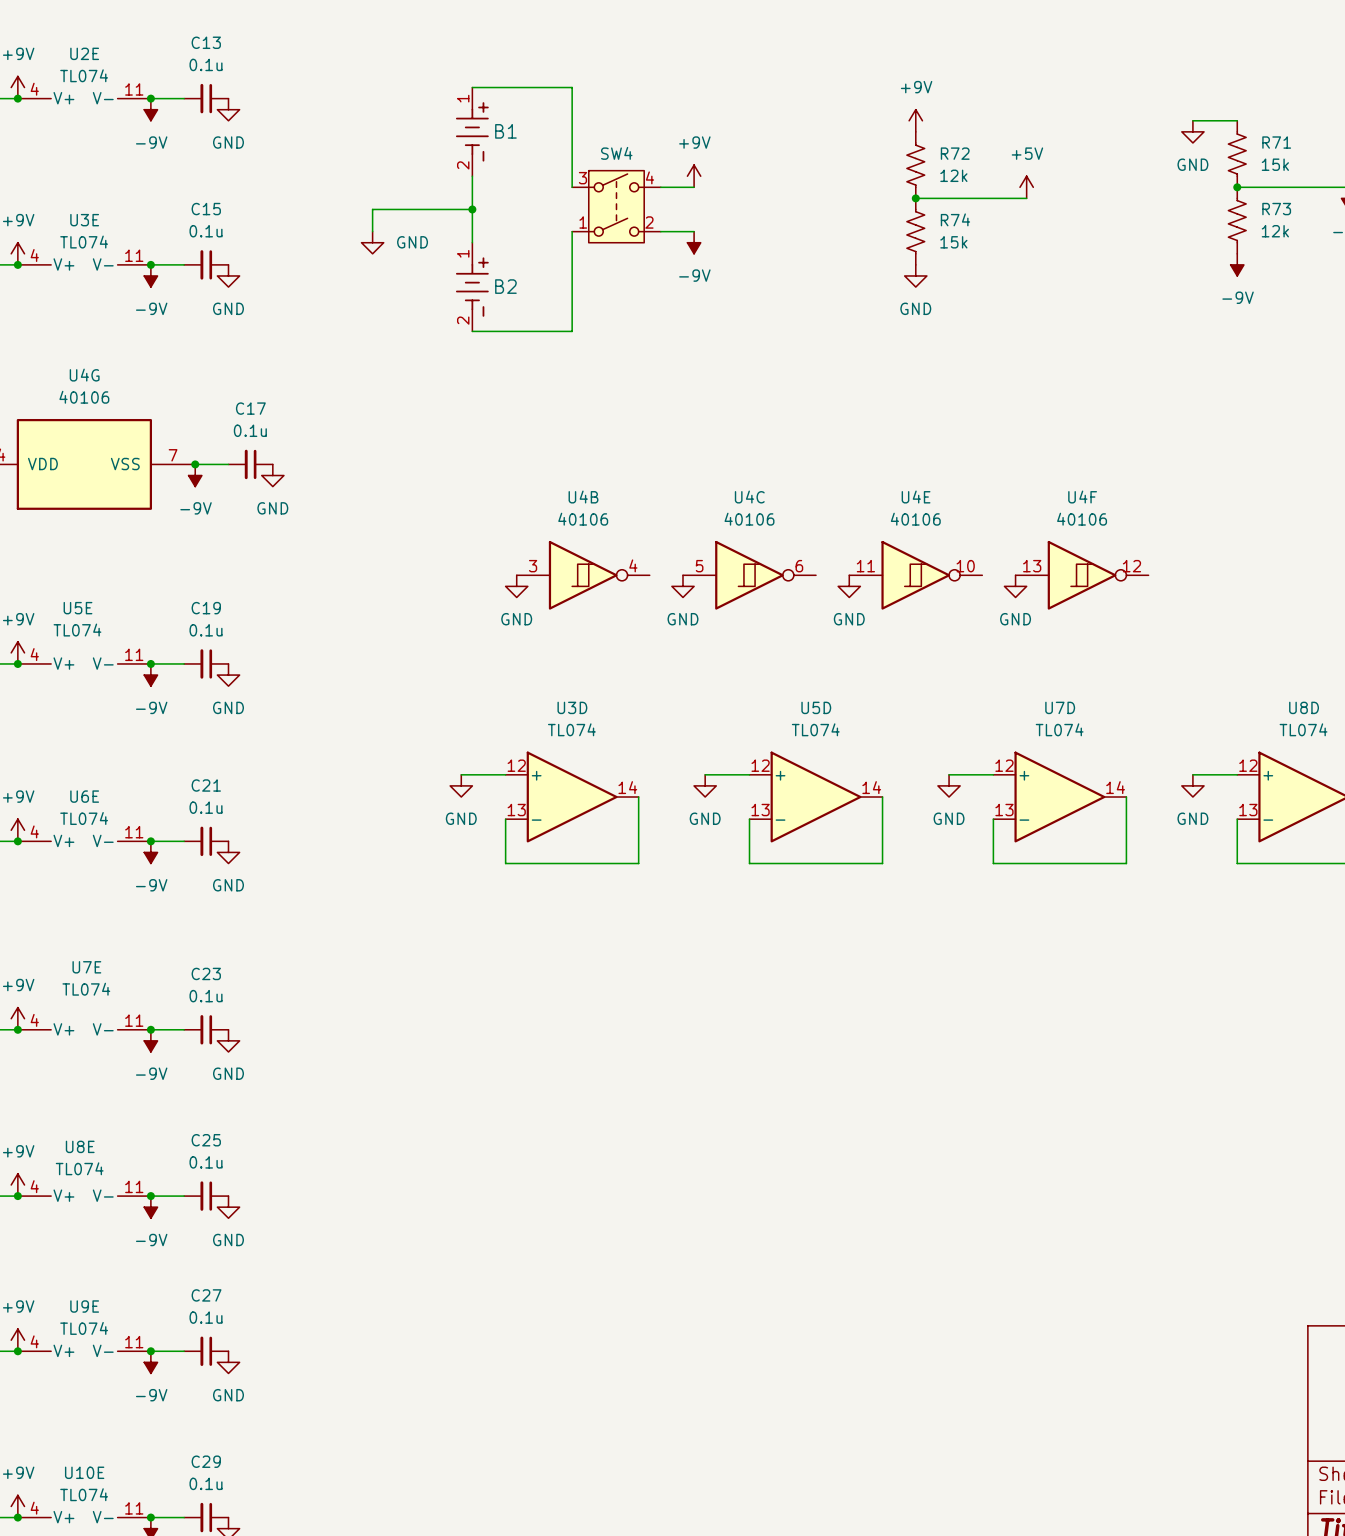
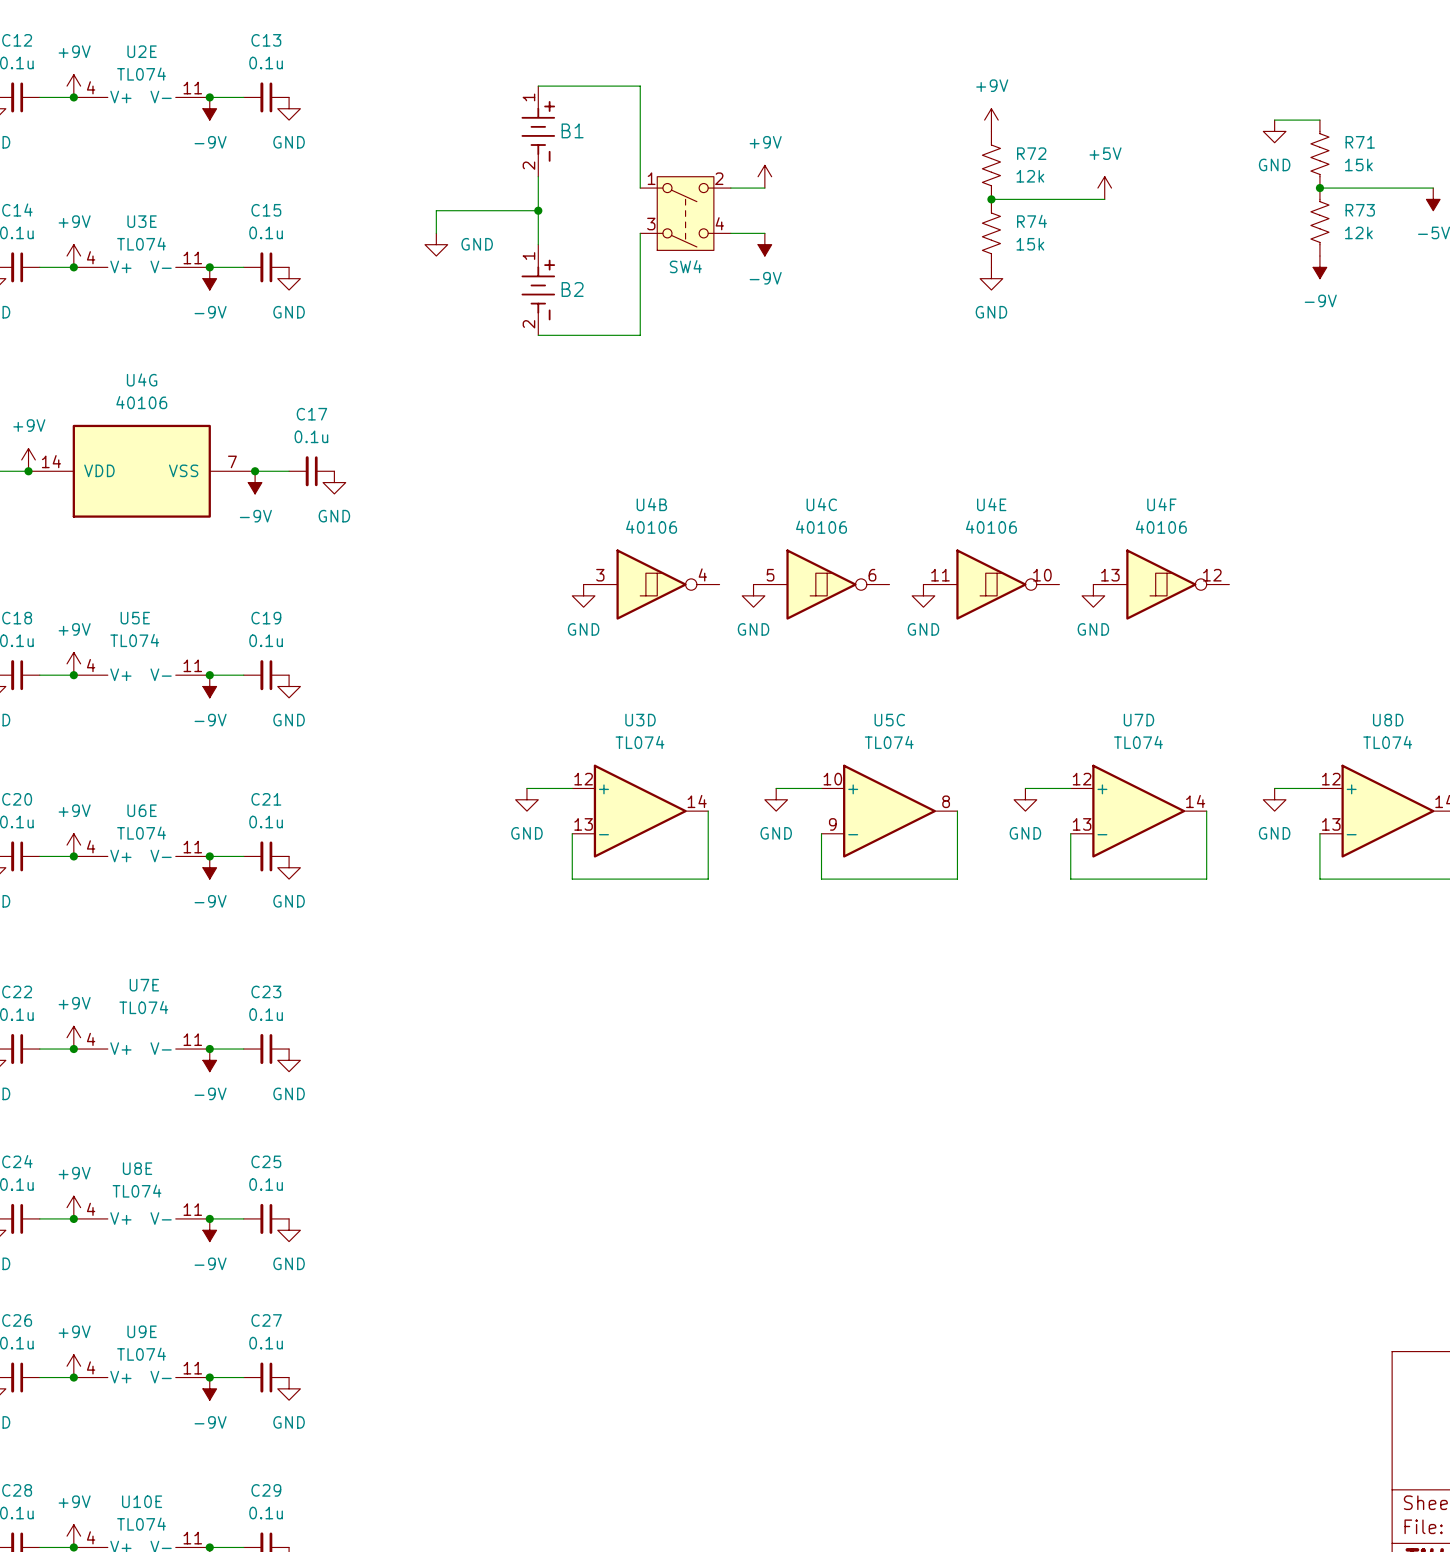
SW4 flip: as is (616, 206) -> up-down (685, 213)
U5D name: U5D (816, 707) -> U5C (889, 720)
U5D pin number: 12 (760, 765) -> 10 (832, 779)
U5D pin number: 14 (871, 787) -> 8 (946, 801)
U5D pin number: 13 (760, 810) -> 9 (832, 824)

